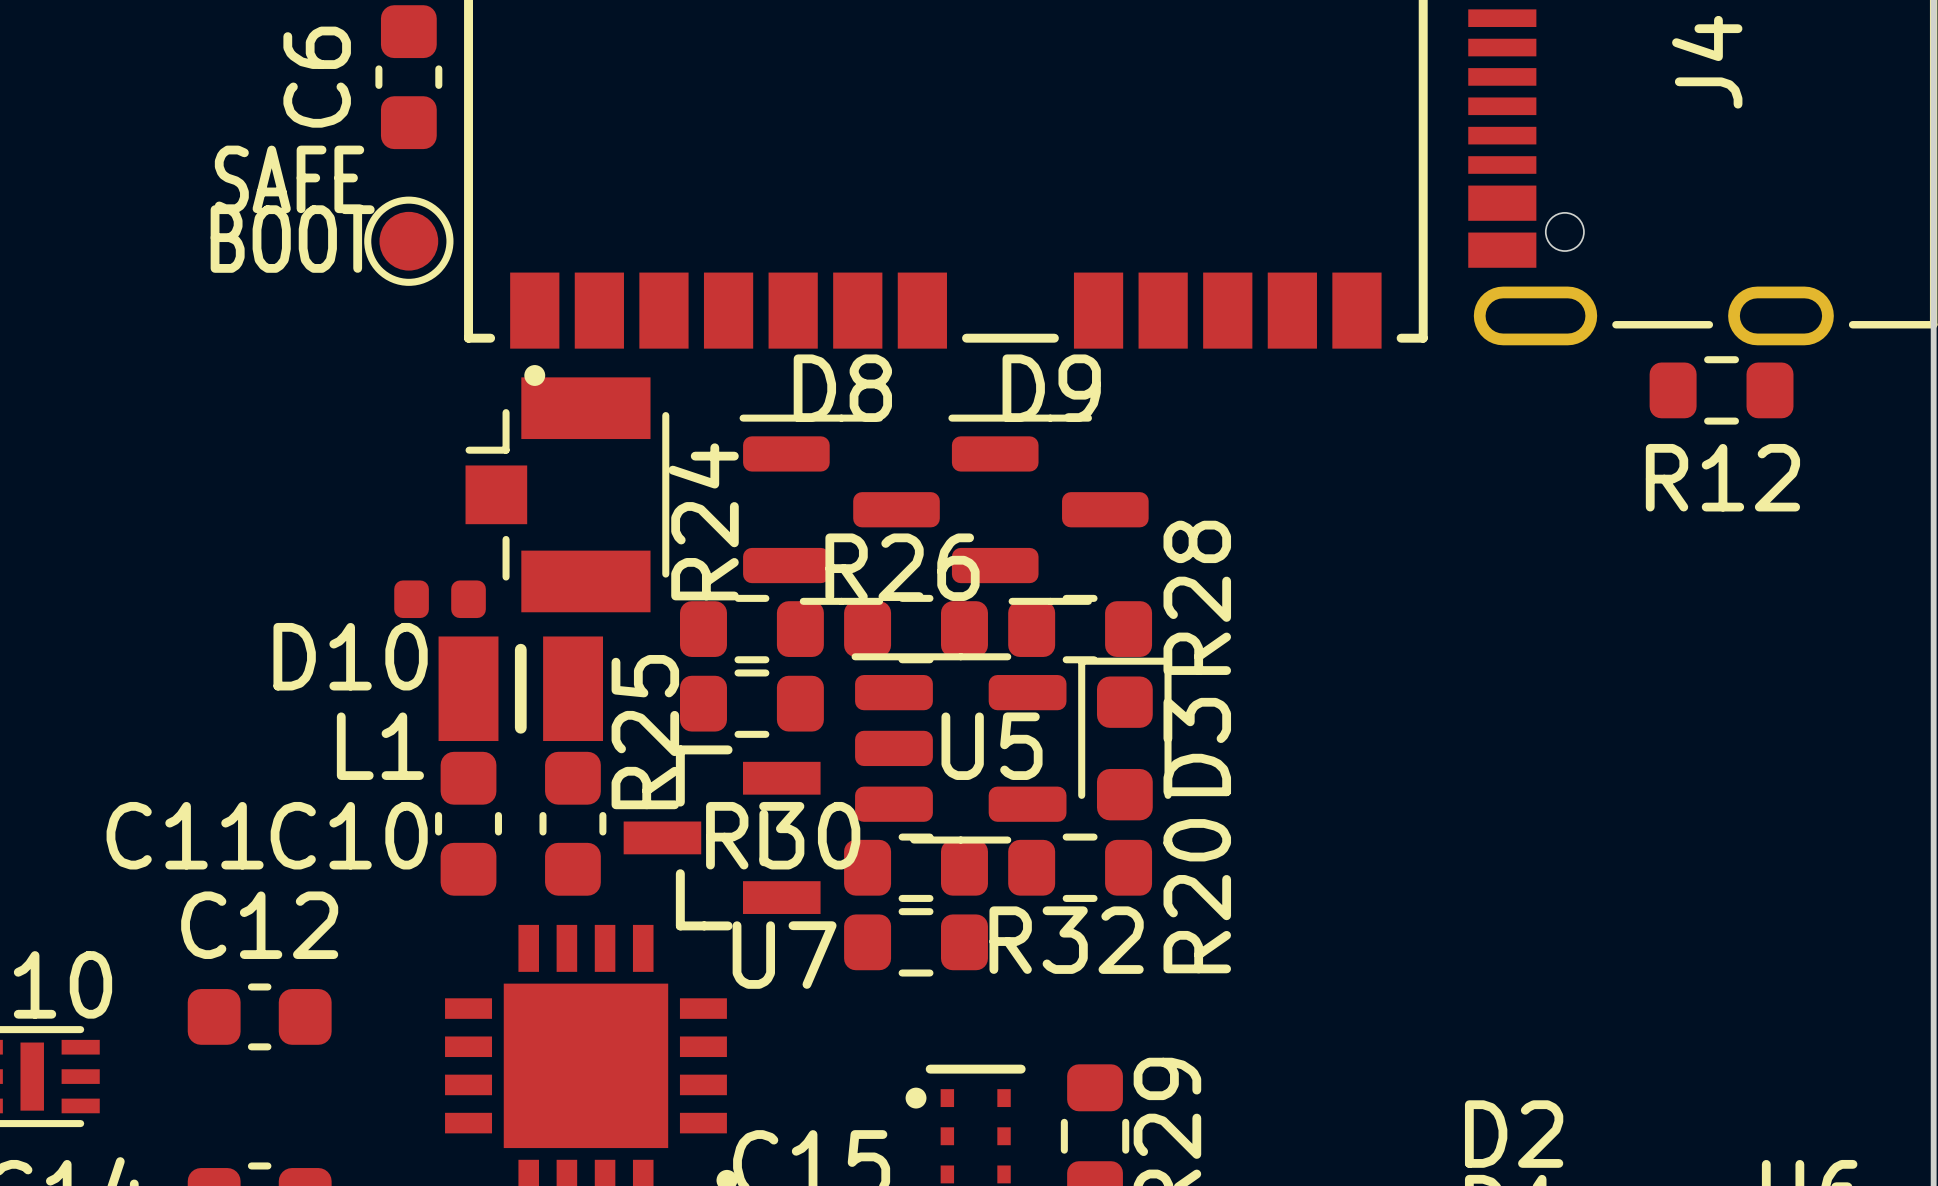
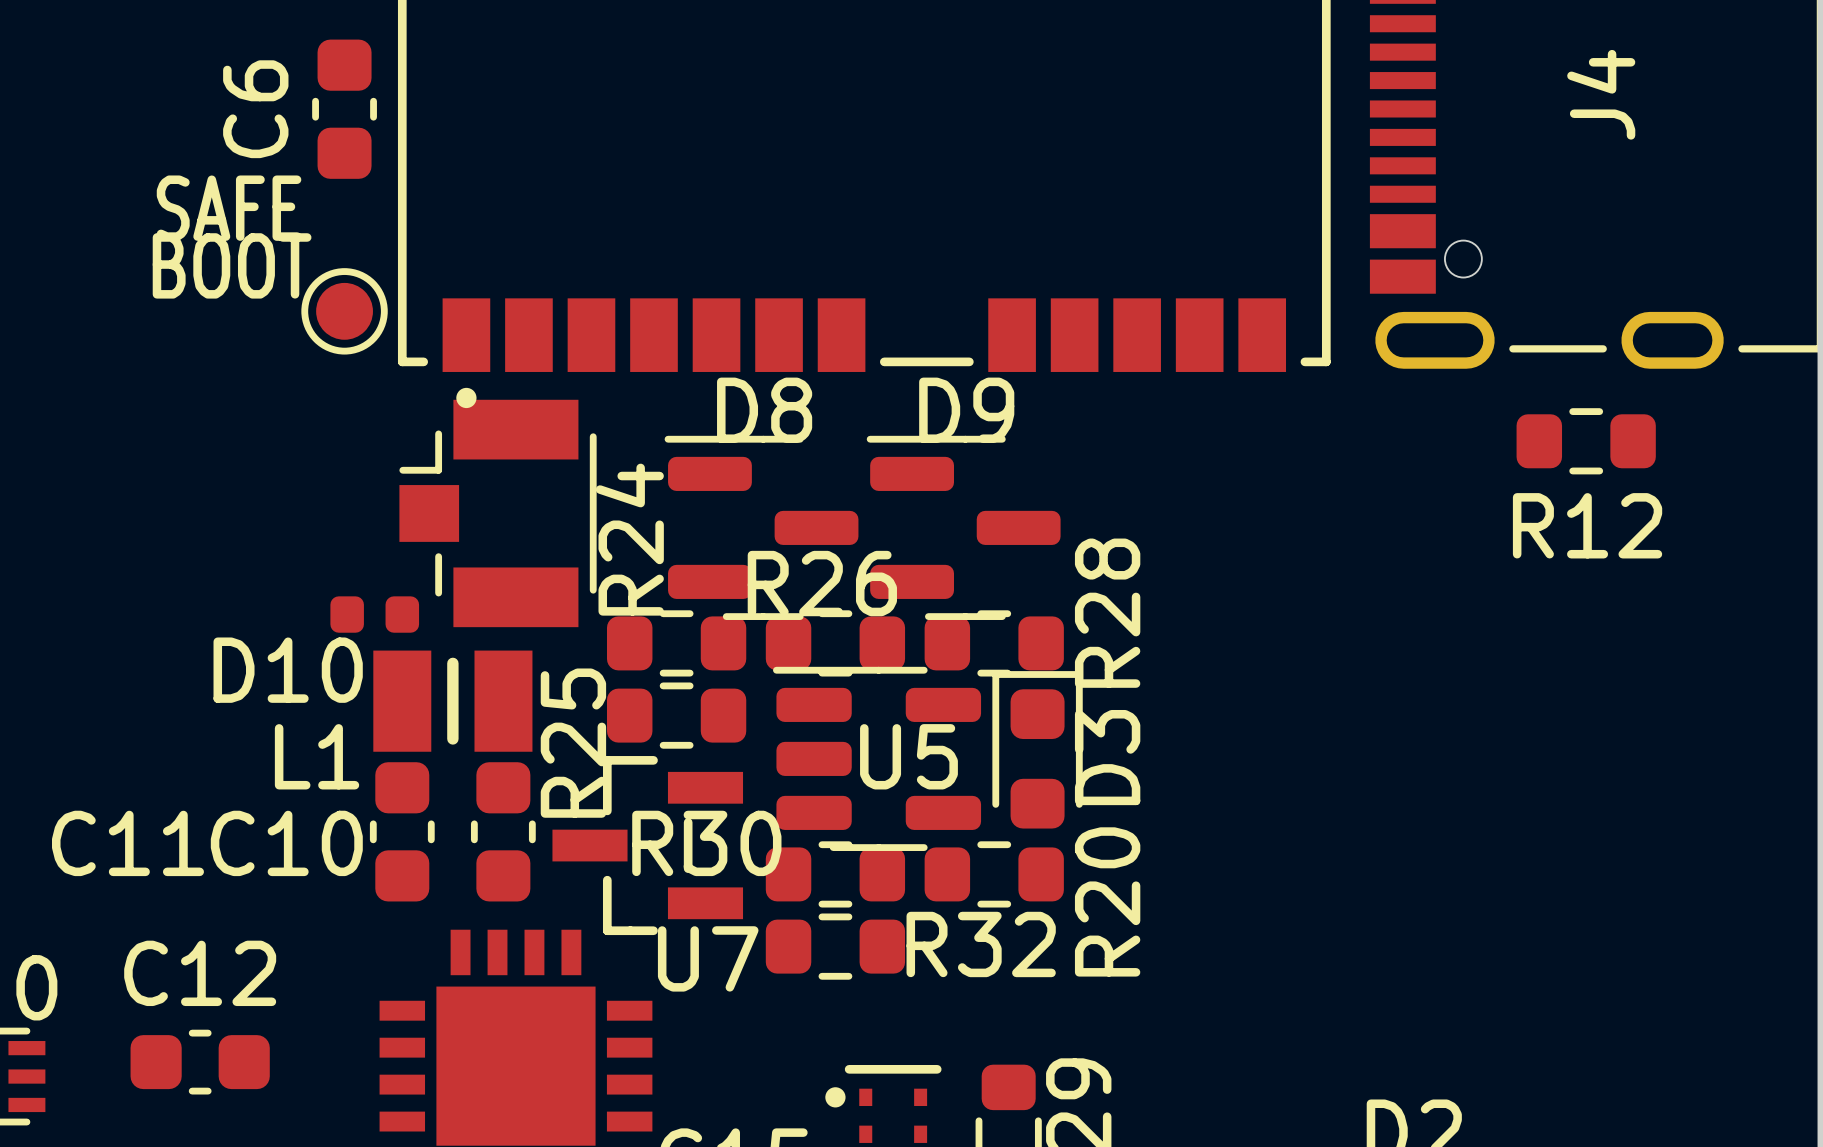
part position: (408, 241) -> (344, 311)
R12 position: (1721, 390) -> (1586, 441)
C12 position: (259, 1016) -> (200, 1062)

